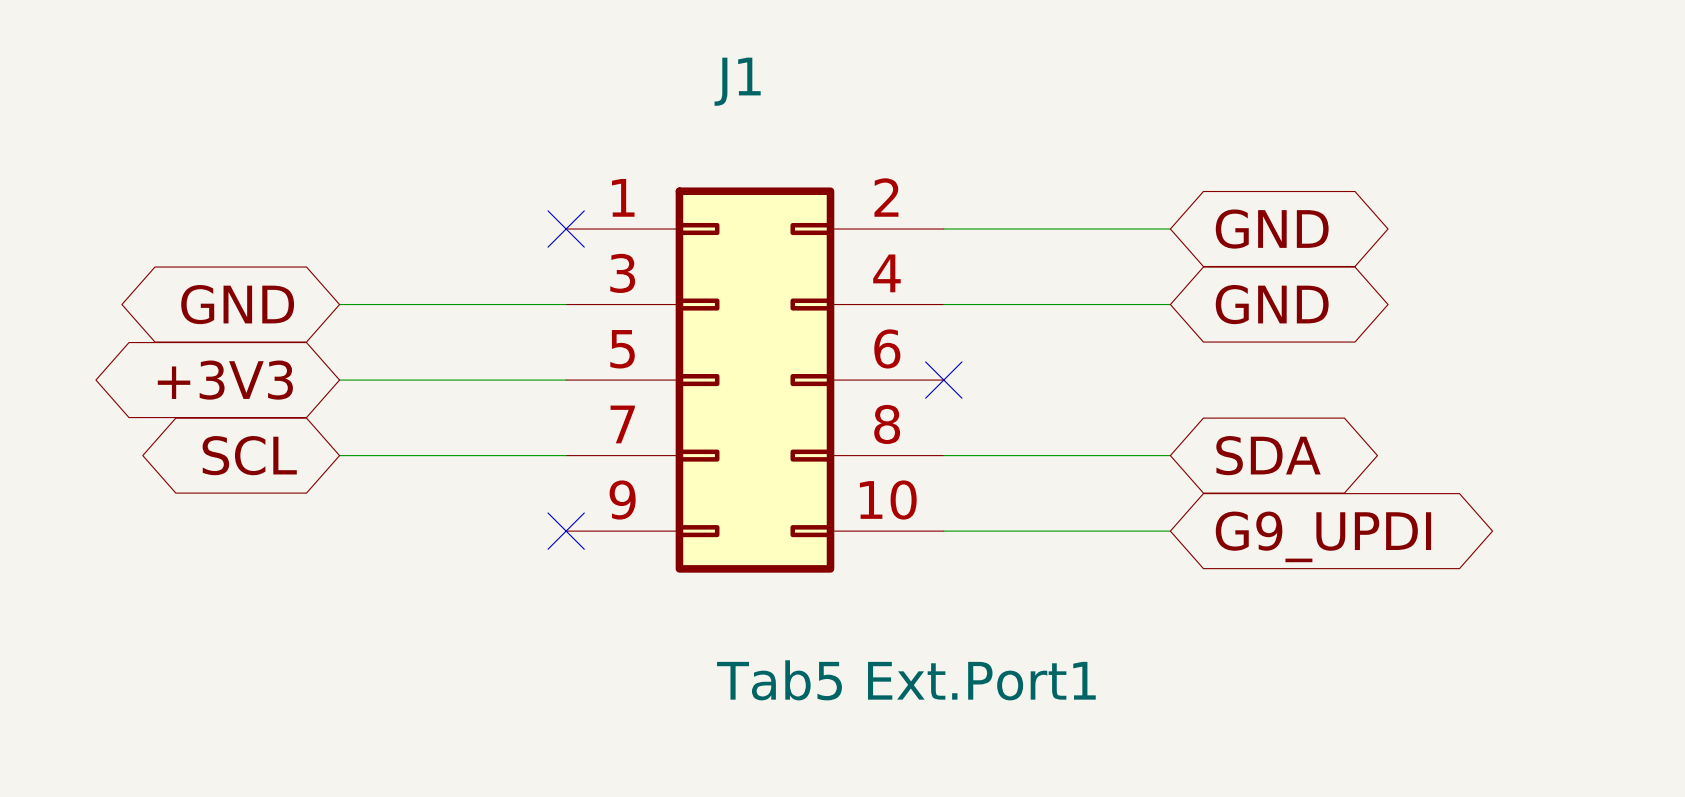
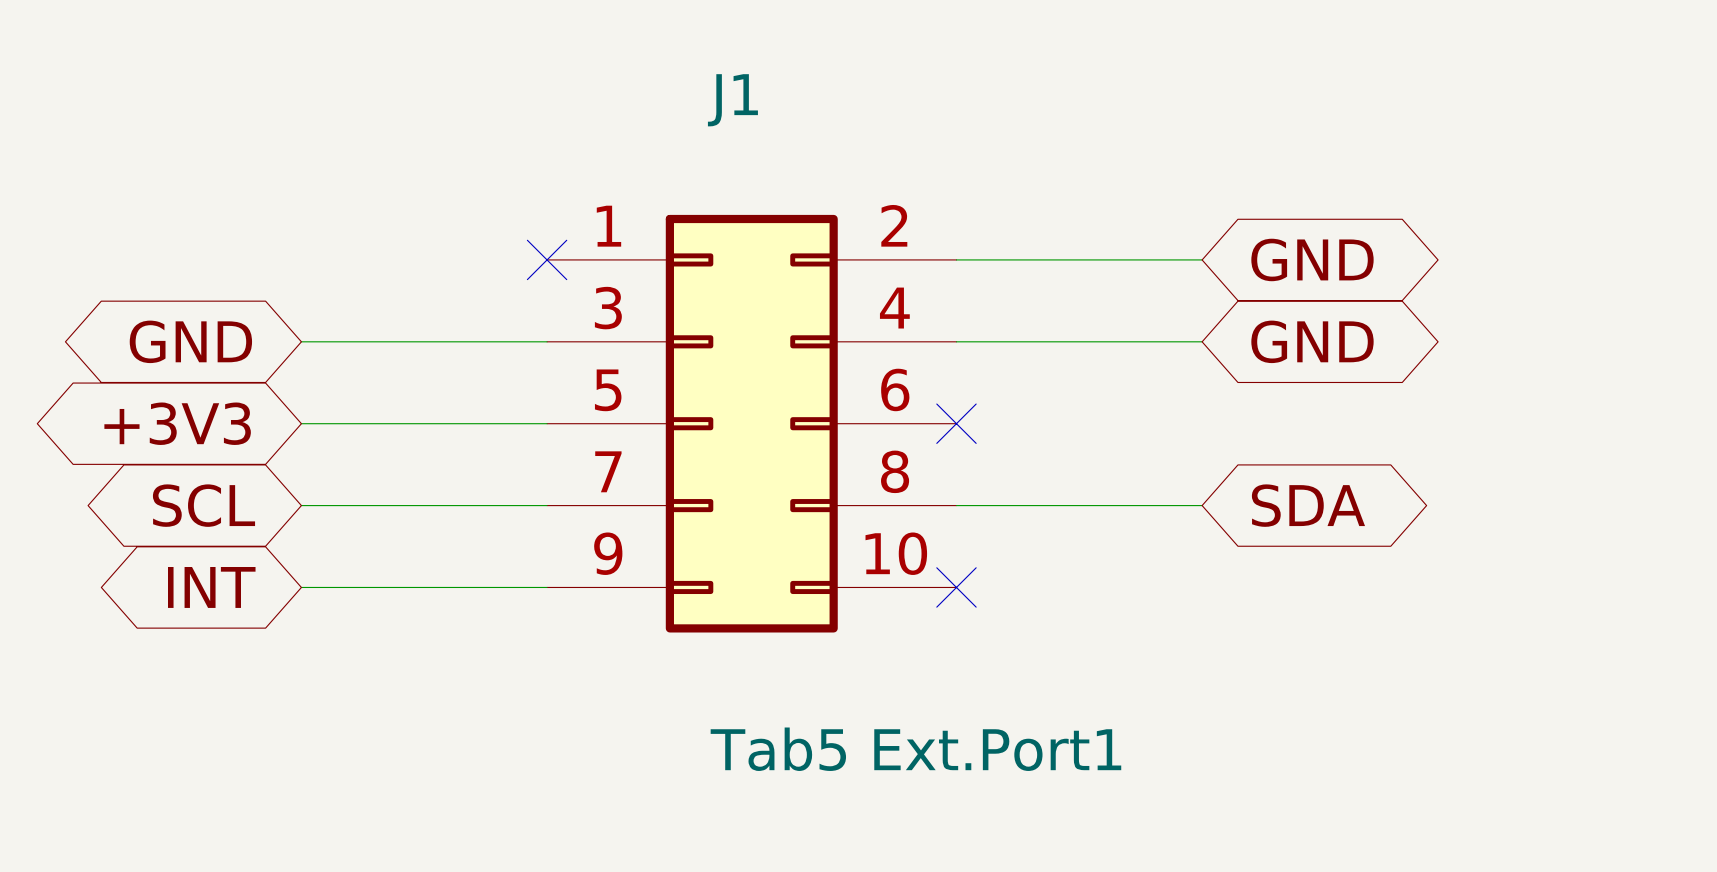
global label: none -> INT (211, 587)
no-connect mark: (566, 531) -> none
wire: (943, 531) (1170, 531) -> (301, 587) (547, 587)
no-connect mark: none -> (956, 587)
global label: G9_UPDI (1323, 536) -> none

